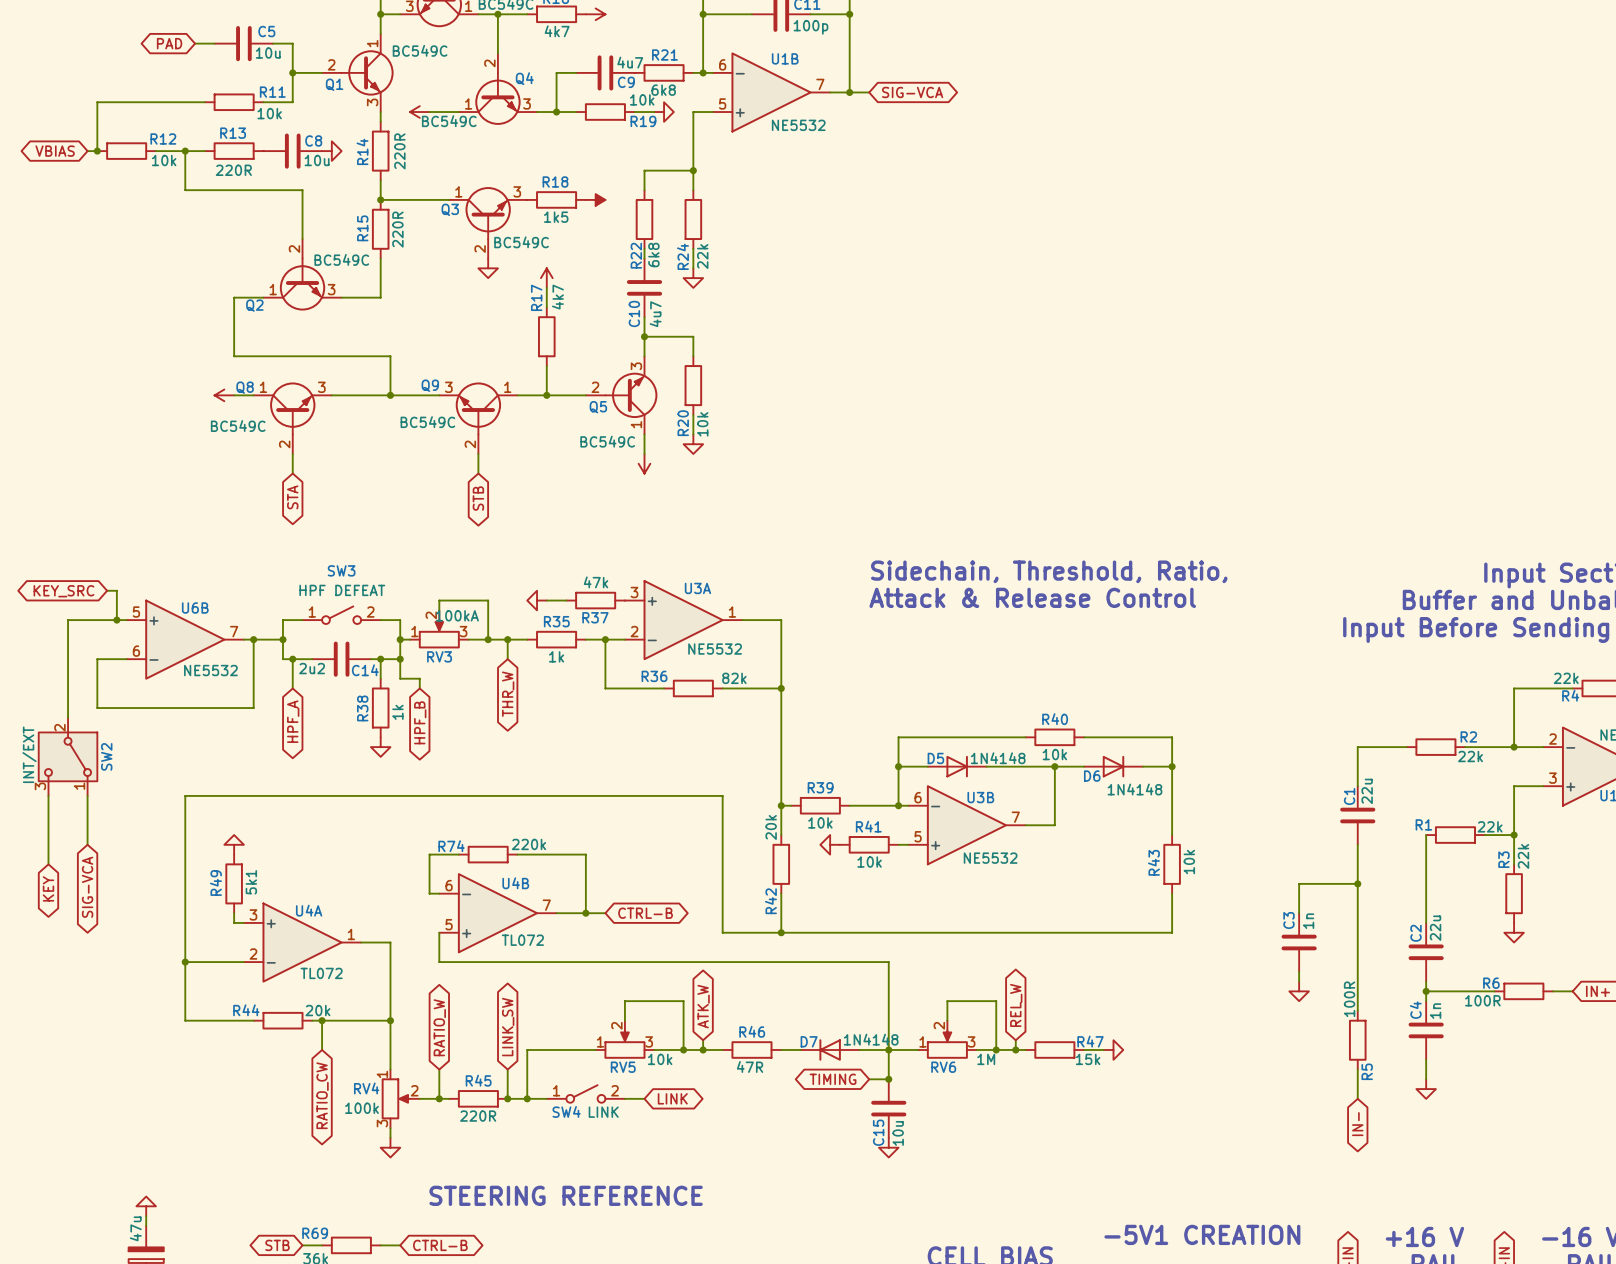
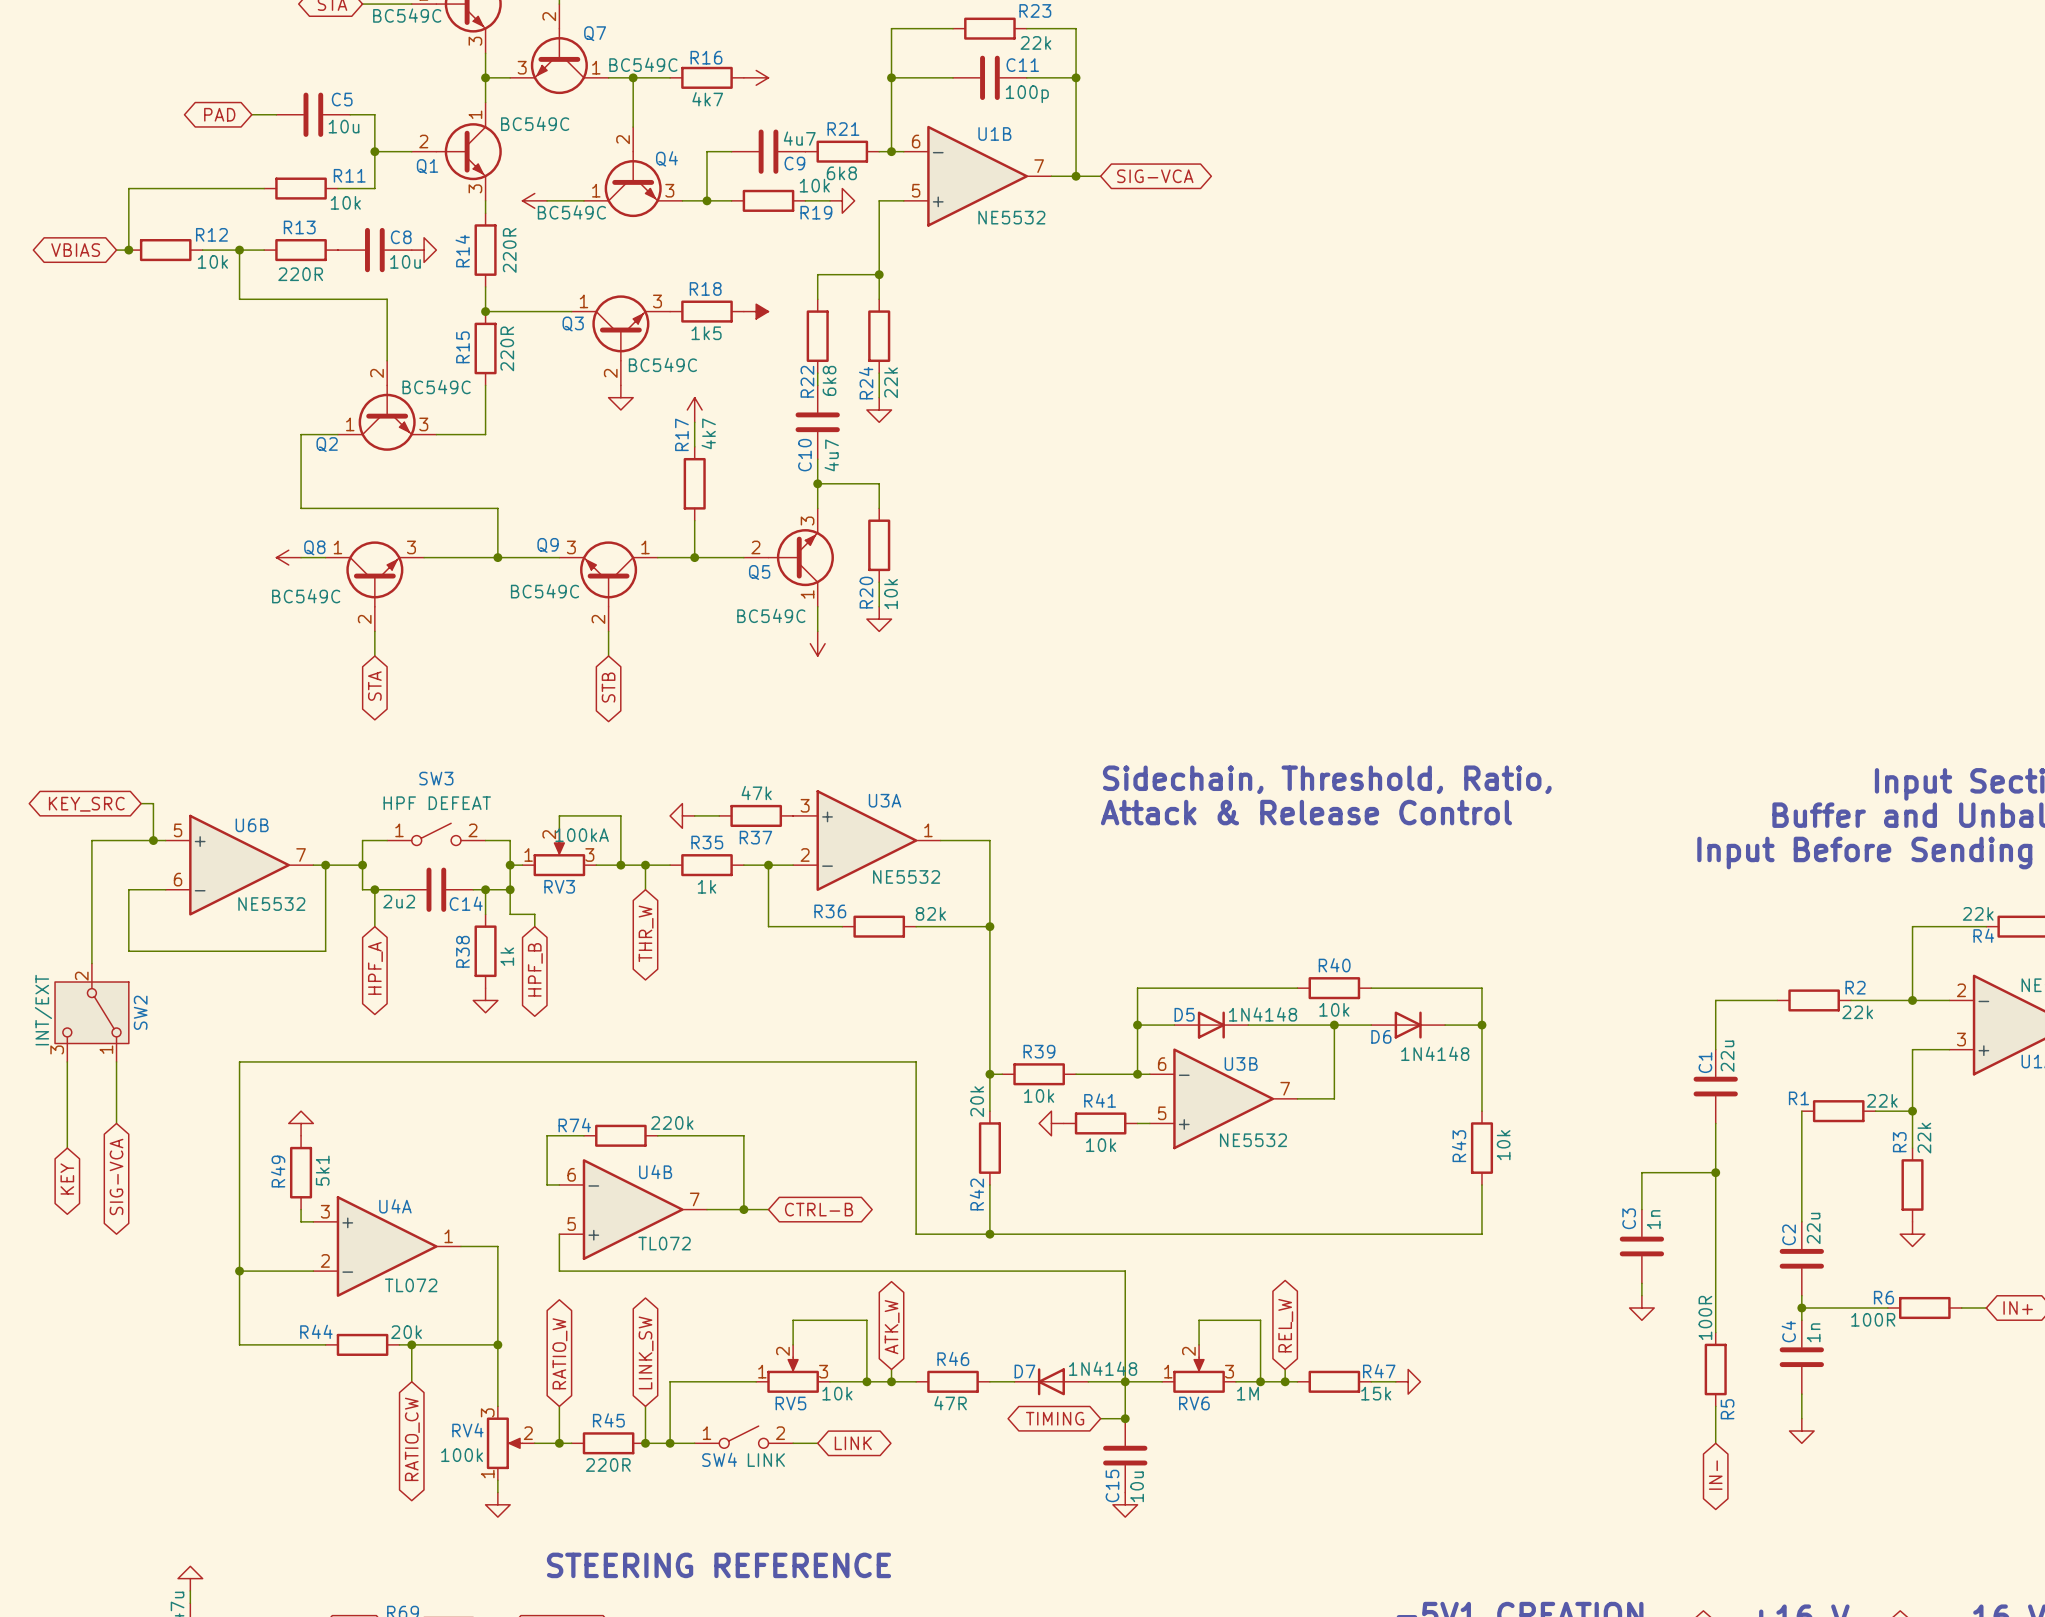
RV4 flip: as is (395, 1098) -> up-down (504, 1443)

